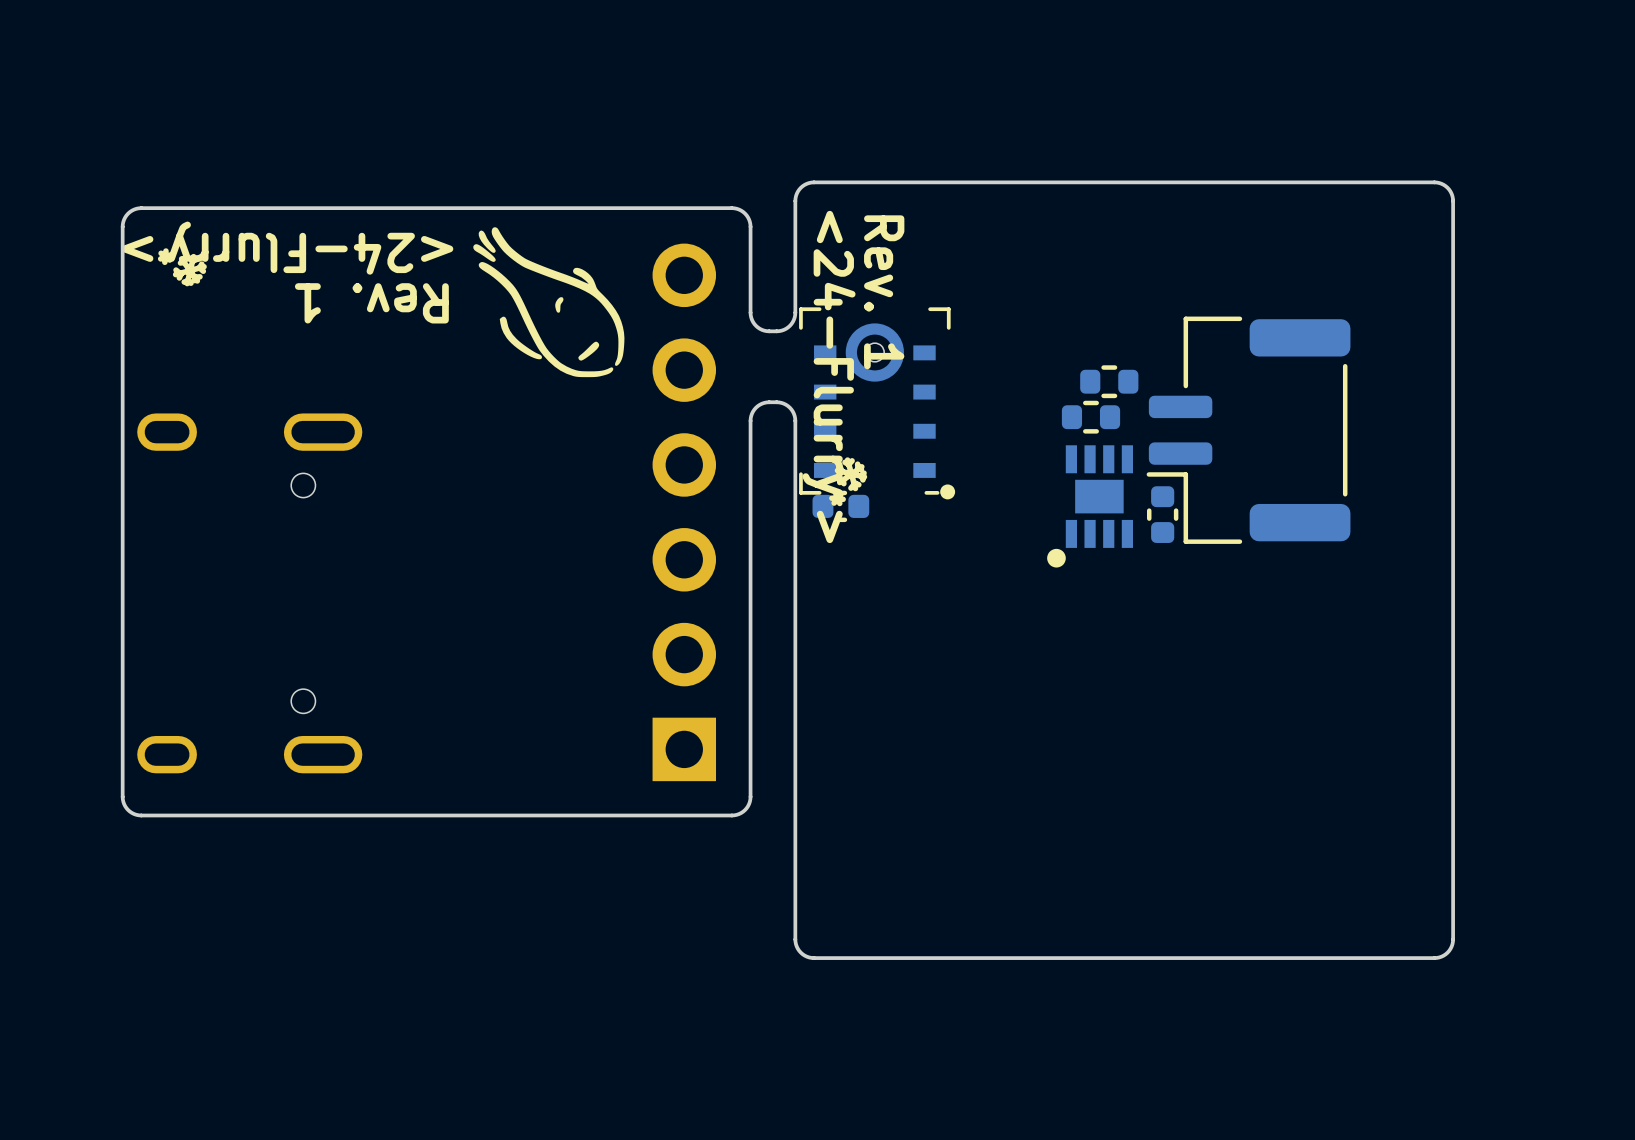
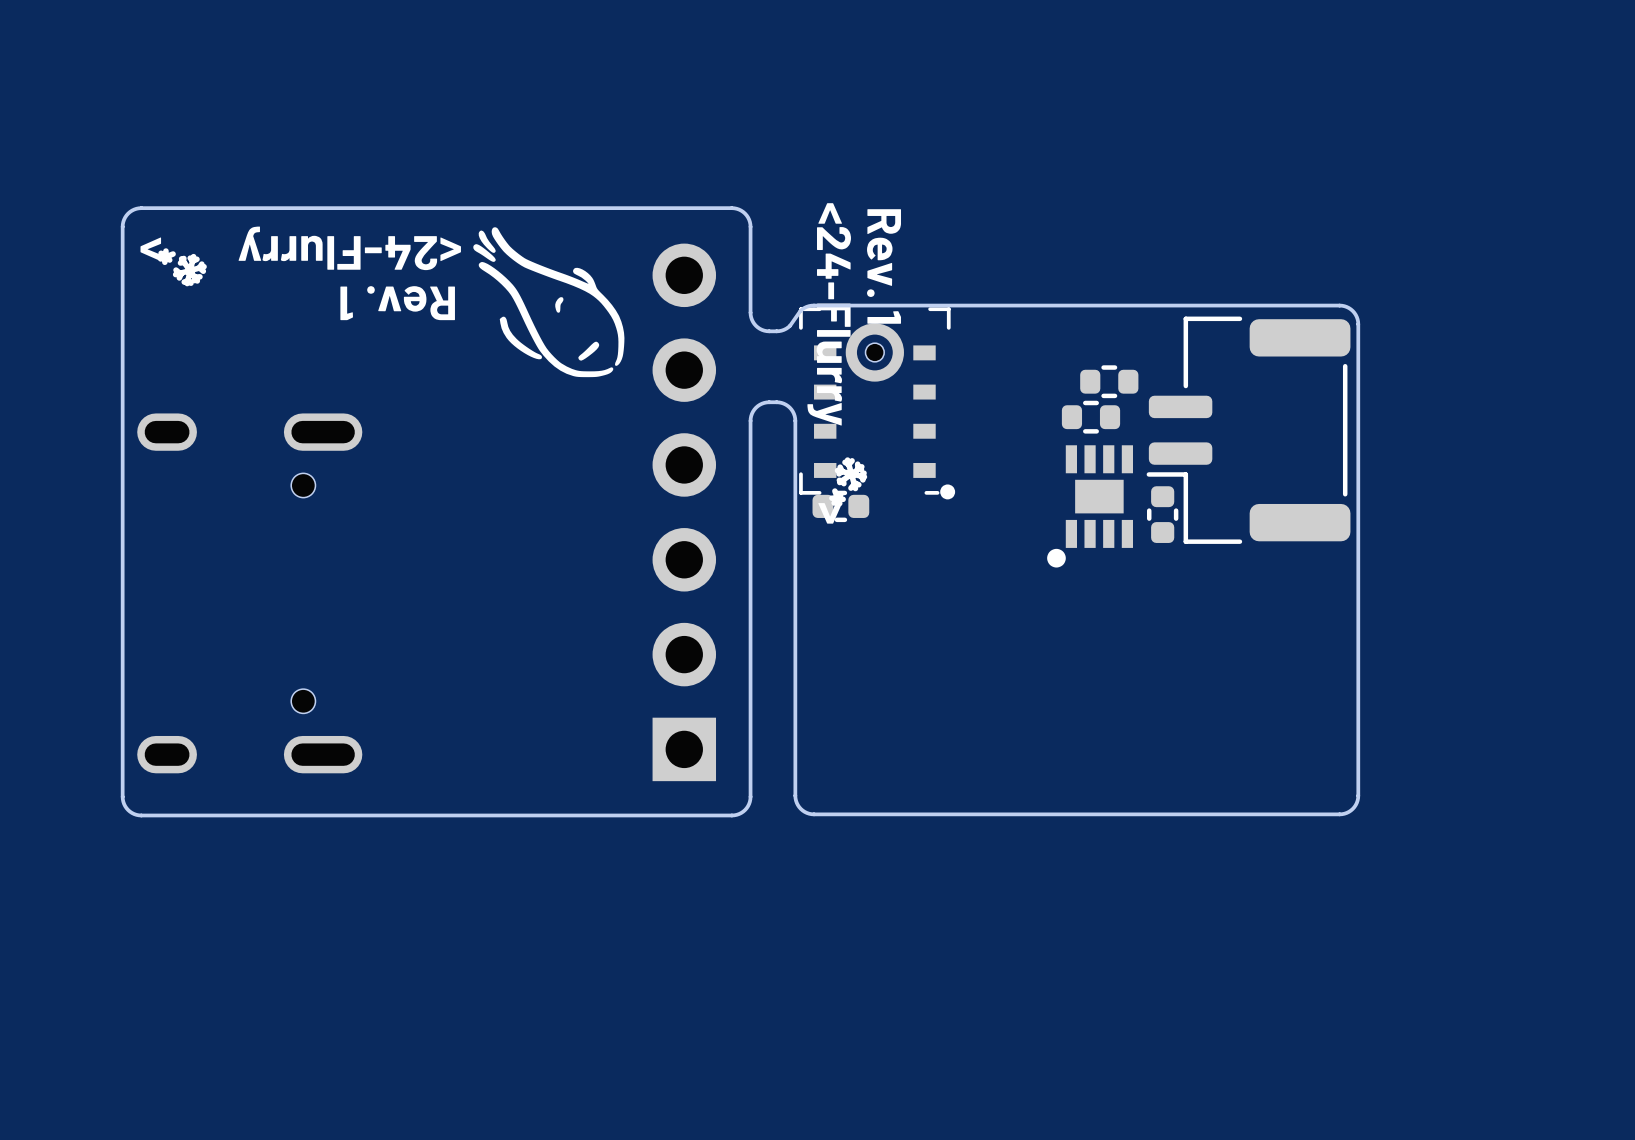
board edge: (776, 331) (788, 327) (794, 317) (795, 198) (800, 187) (811, 182) (1434, 182) (1445, 186) (1452, 198) (1453, 939) (1447, 952) (1434, 958) (809, 957) (799, 950) (795, 941) (795, 795) -> (776, 331) (788, 327) (802, 309) (814, 305) (1339, 305) (1352, 311) (1358, 324) (1358, 795) (1356, 802) (1350, 810) (1339, 814) (814, 814) (800, 808) (795, 795)

